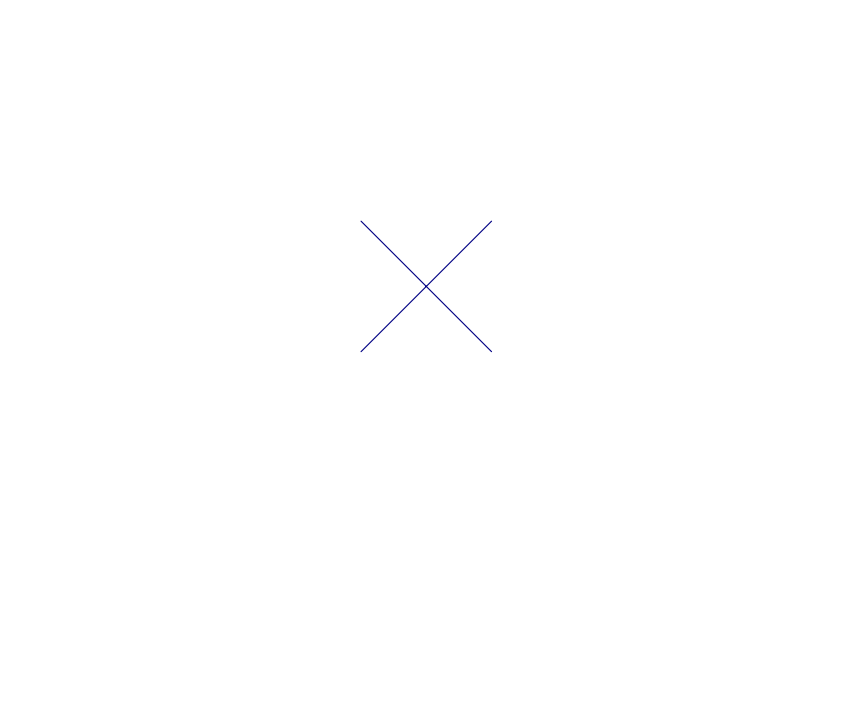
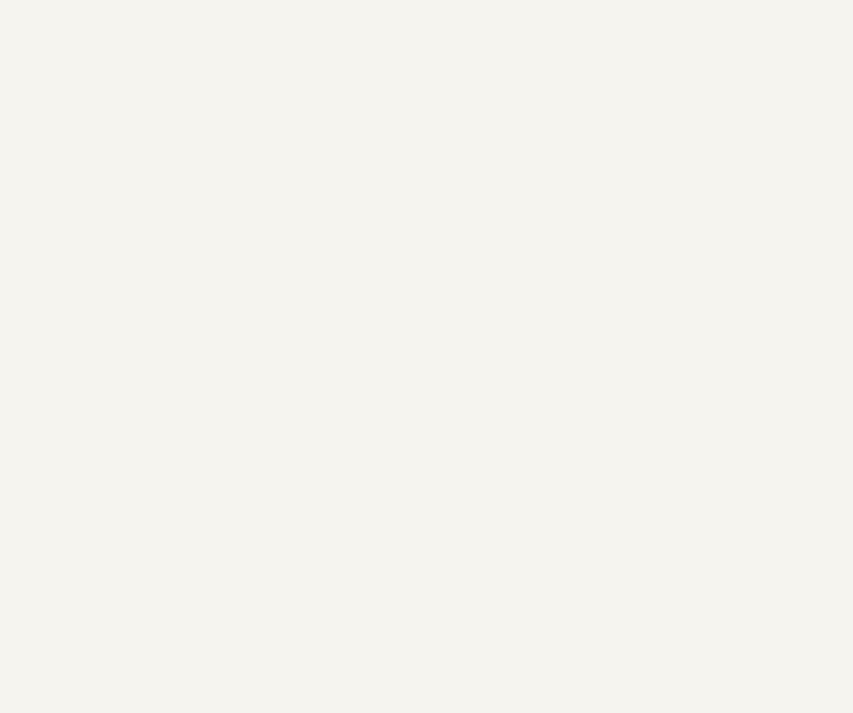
no-connect mark: (426, 286) -> none

